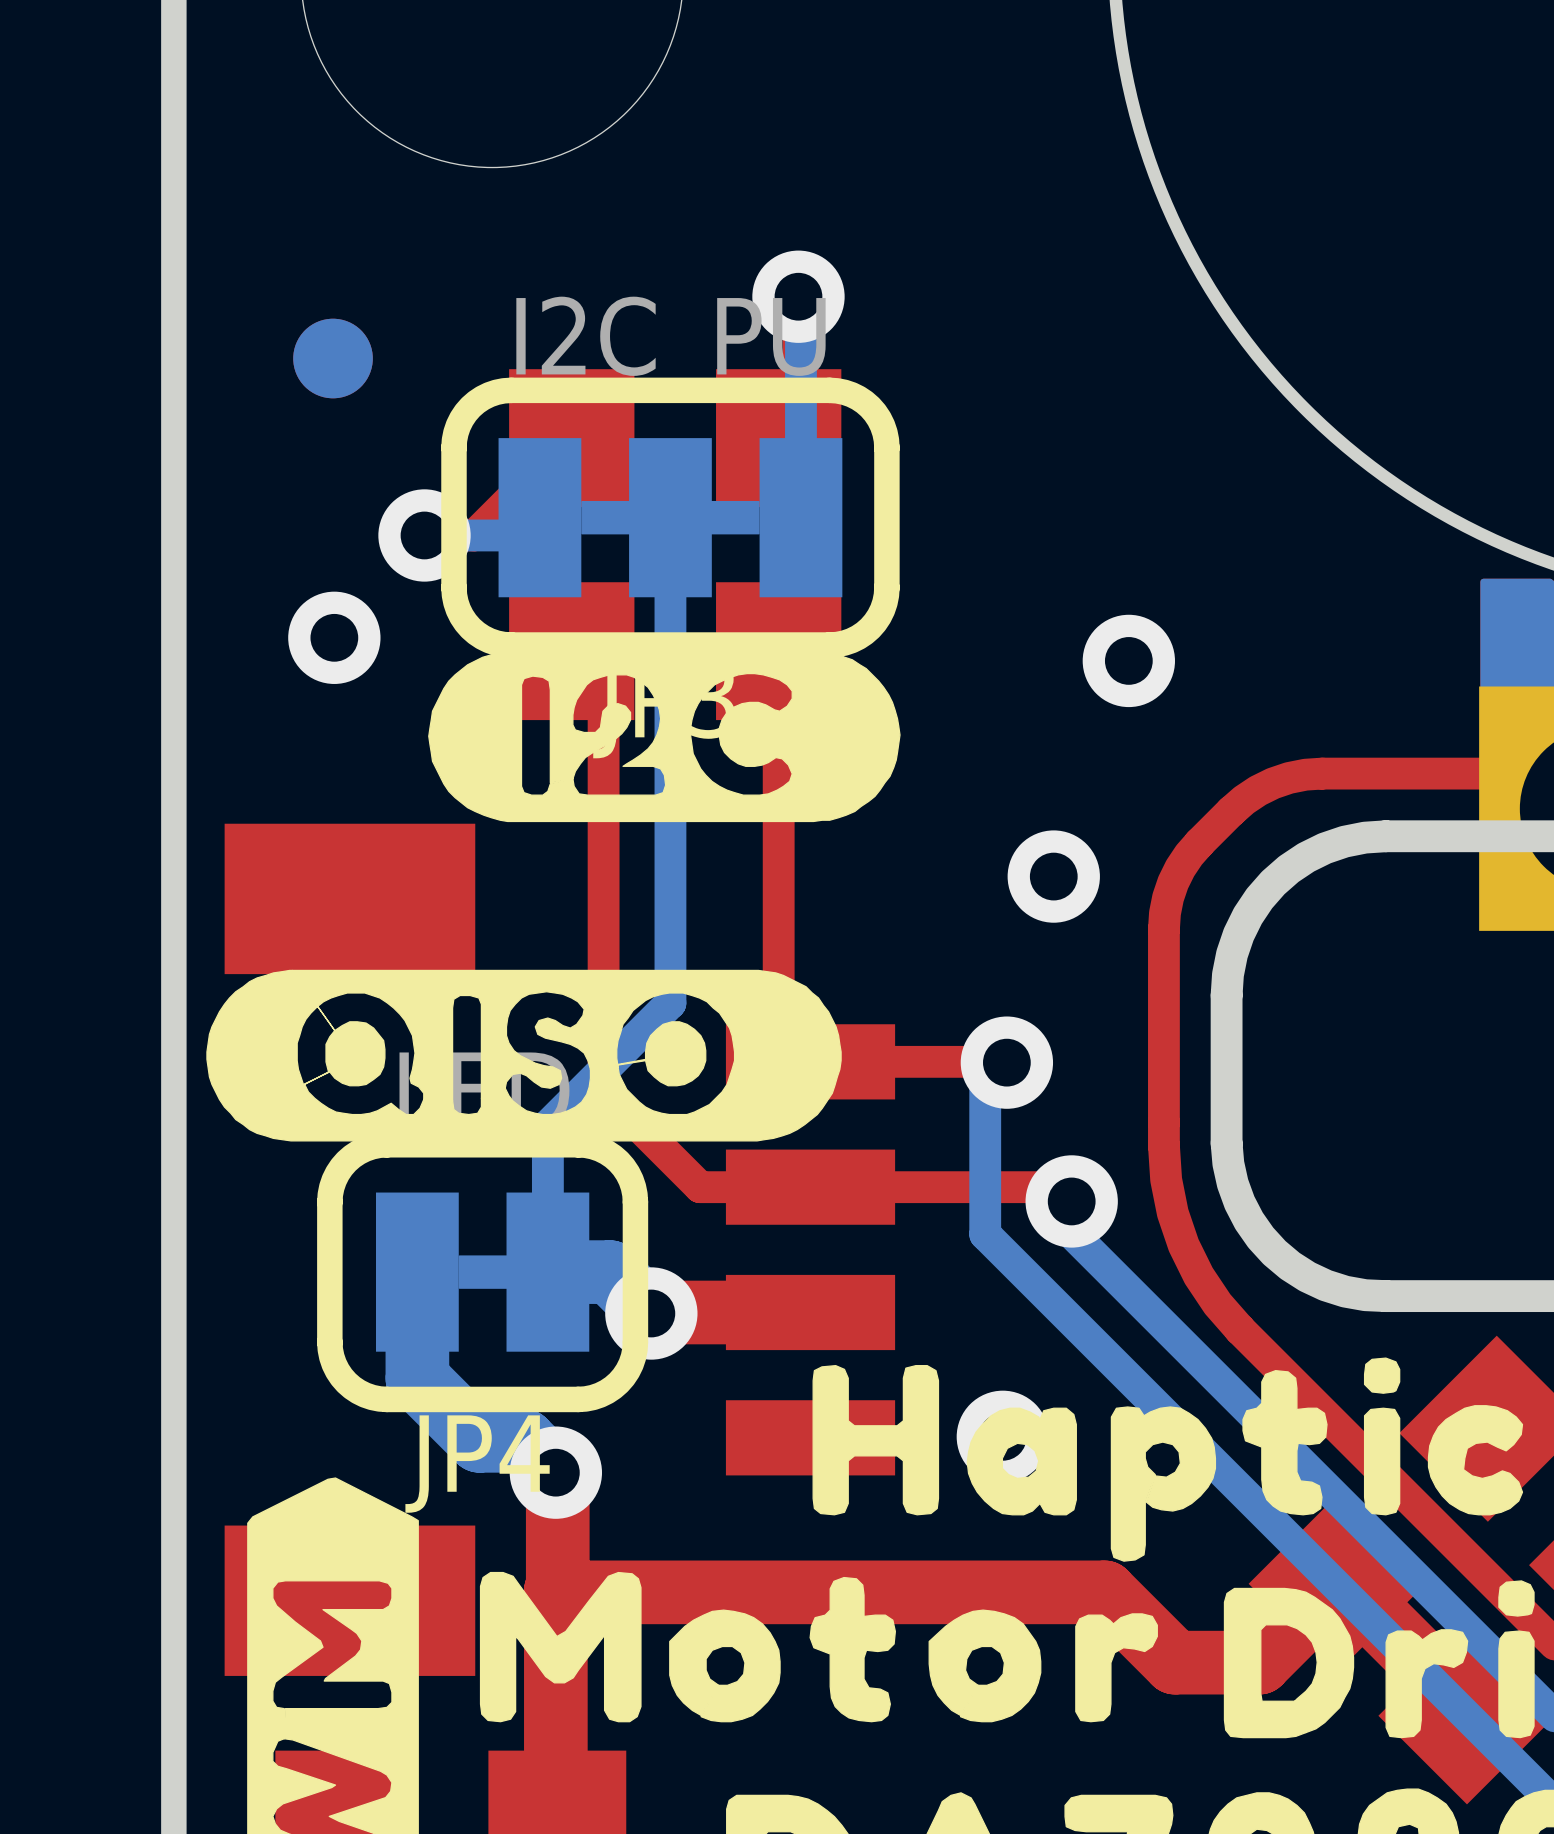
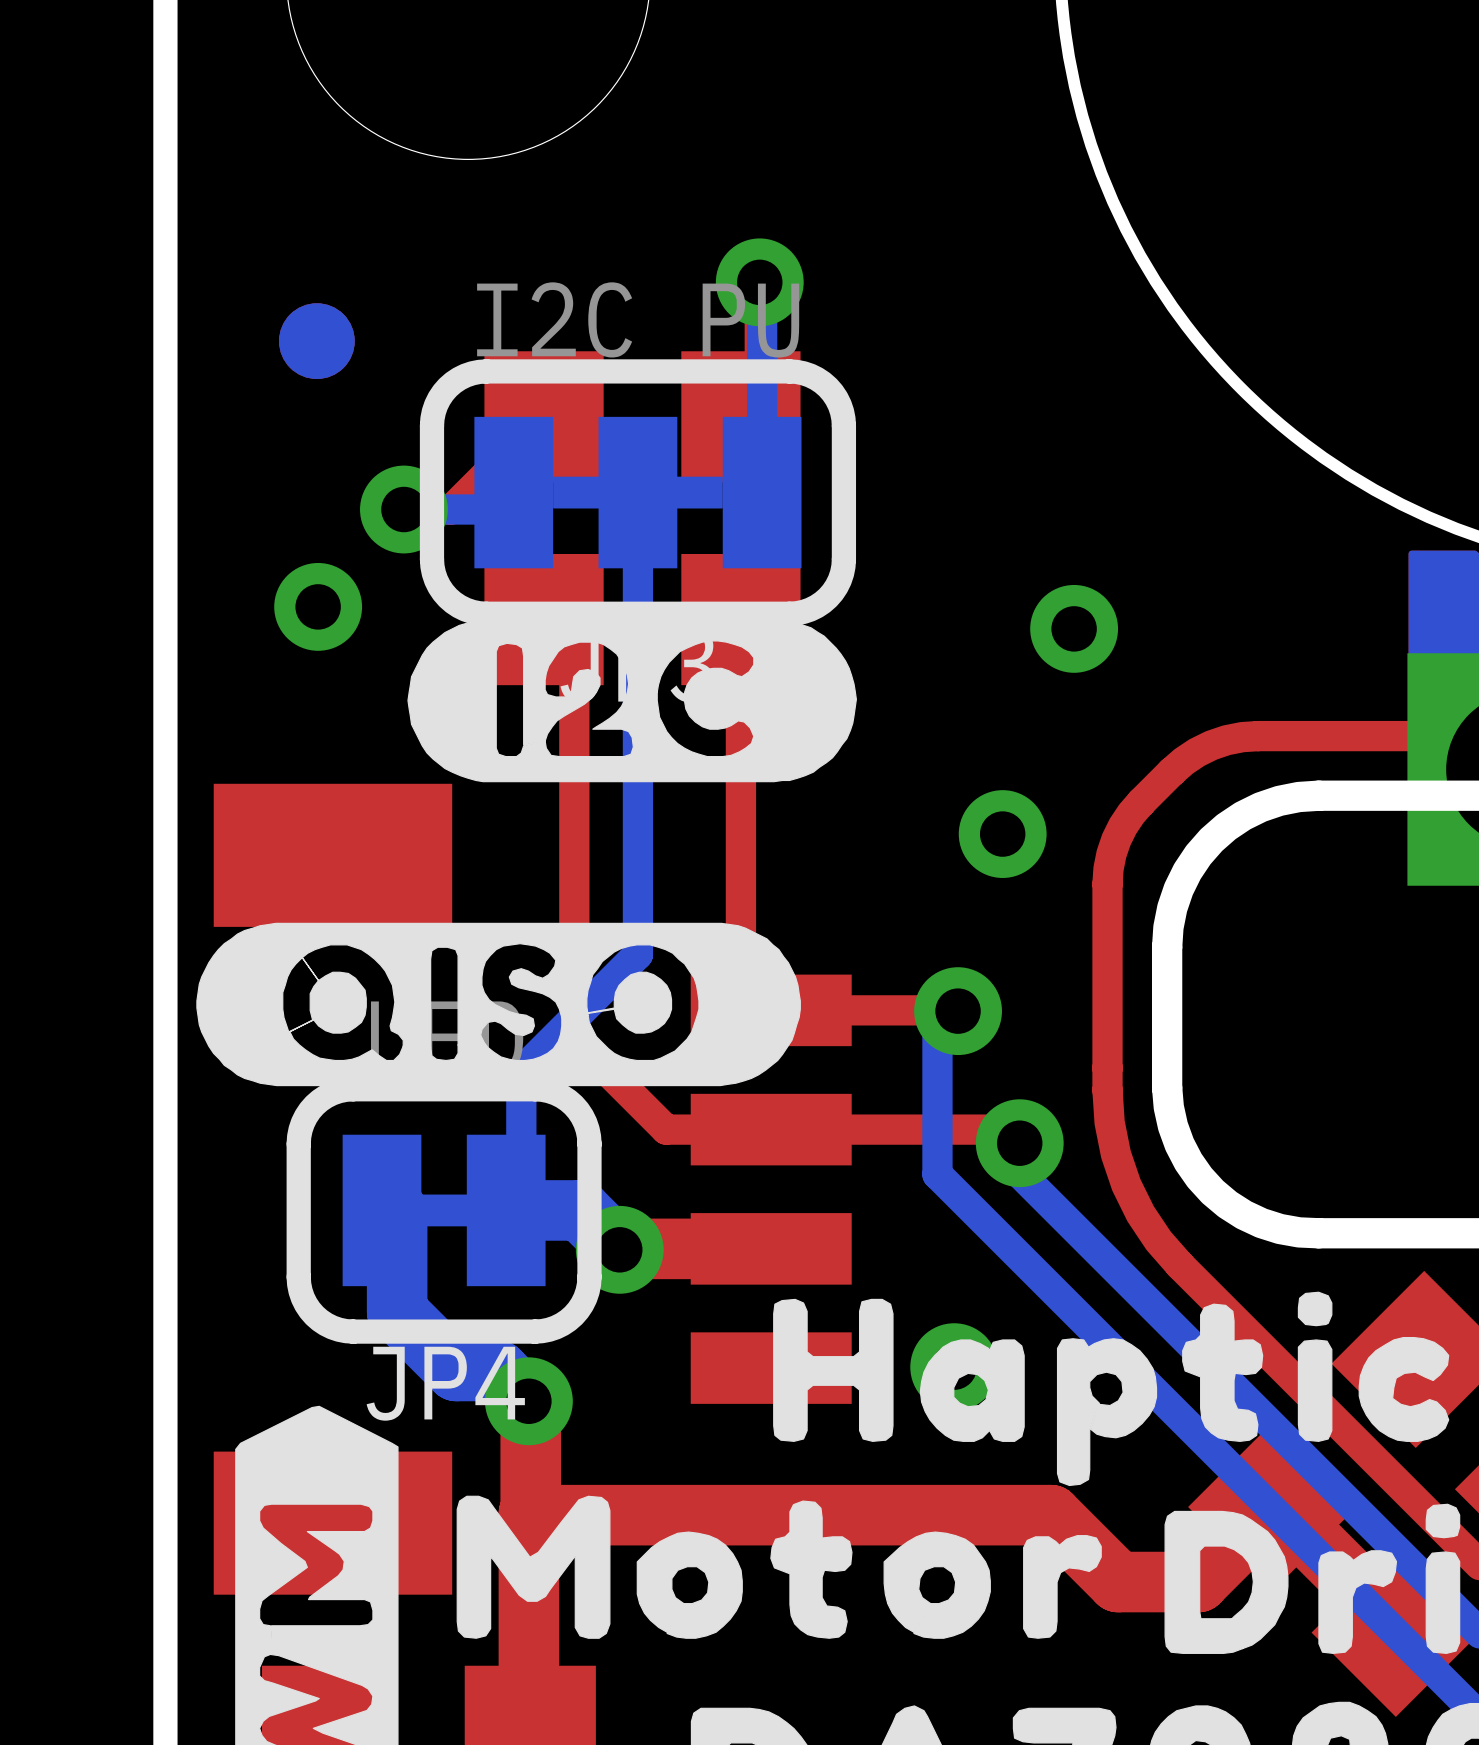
JP4 position: (482, 1272) -> (444, 1210)

